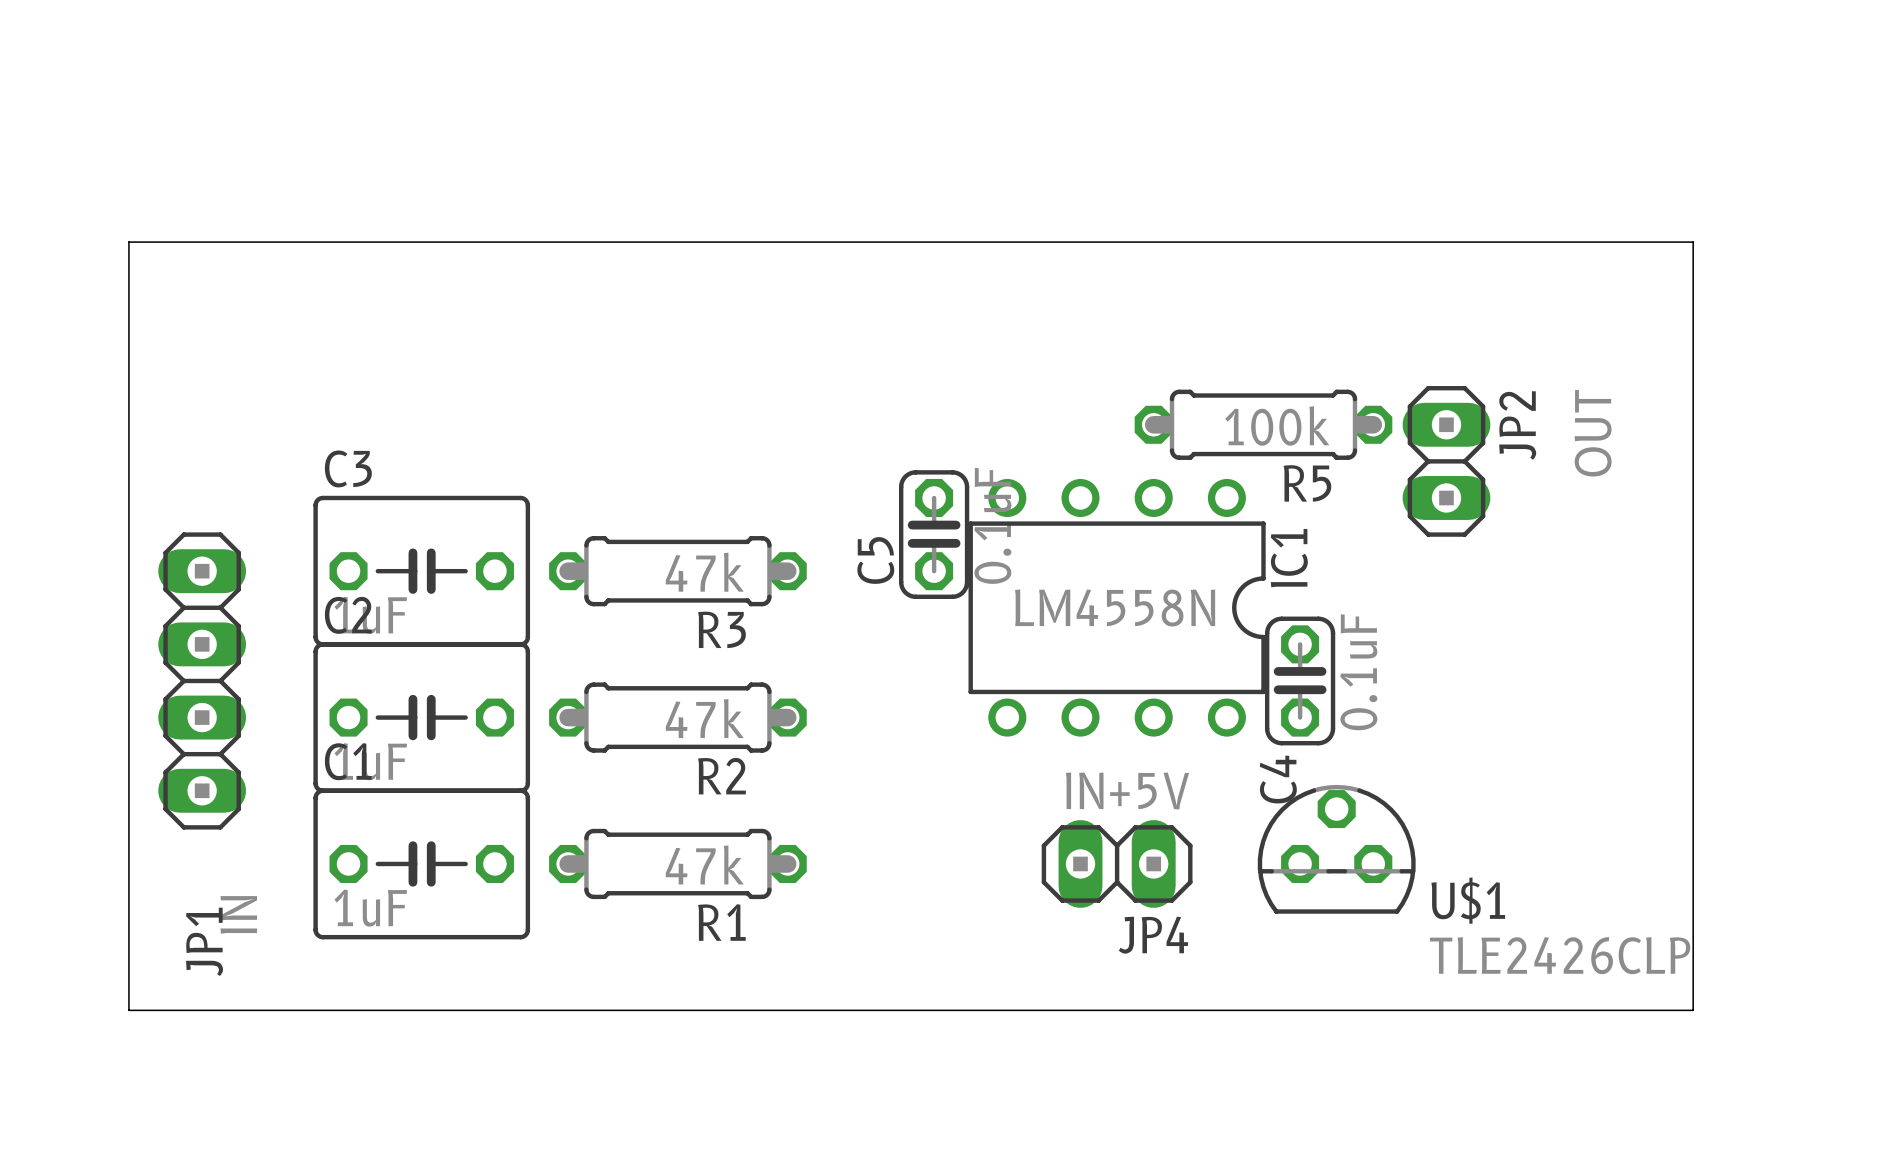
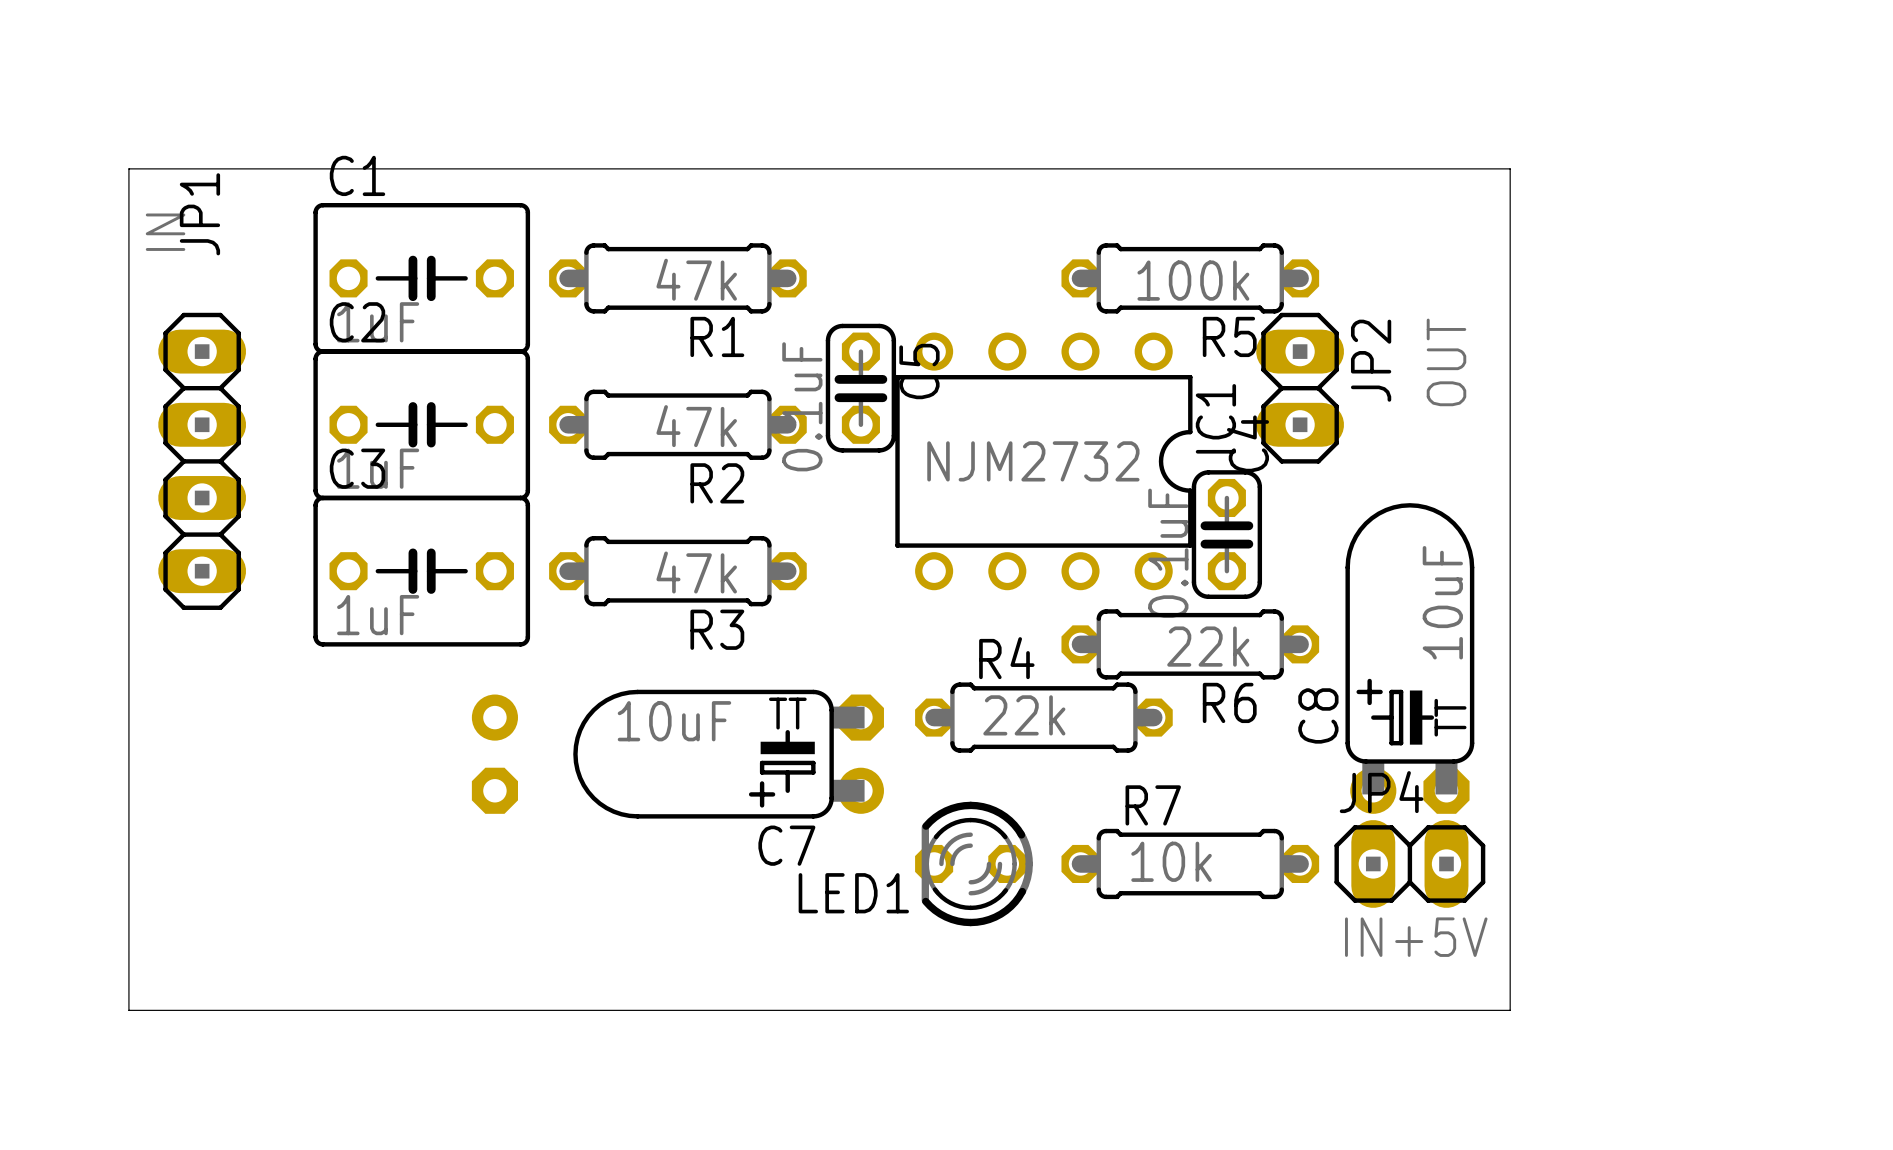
board edge: (128, 242) (1693, 242) (1693, 1010) (1510, 1010) -> (128, 242) (128, 168) (1510, 168) (1510, 1010)
R5 position: (1263, 424) -> (1190, 278)
JP2 position: (1446, 461) -> (1300, 388)
C5 rotation: 0° (934, 534) -> 180° (860, 388)
C5 position: (934, 534) -> (860, 388)
IC1 value: LM4558N (1115, 607) -> NJM2732 (1033, 461)
IC1 position: (1117, 607) -> (1043, 461)
R6: none -> 22k (1190, 644)
C8: none -> 10uF (1409, 658)
JP1 position: (202, 680) -> (202, 461)
C4 rotation: 0° (1300, 680) -> 180° (1226, 534)
C4 position: (1300, 680) -> (1226, 534)
C2 position: (421, 717) -> (421, 424)
R2 position: (677, 717) -> (677, 424)
R4: none -> 22k (1043, 717)
part: none -> (494, 754)
C7: none -> 10uF (728, 754)
JP4 value position: IN+5V (1127, 791) -> IN+5V (1416, 937)
U$1: TLE2426CLP (1336, 849) -> none
C1 position: (421, 863) -> (421, 278)
R1 position: (677, 863) -> (677, 278)
LED1: none -> (974, 863)
JP4 position: (1117, 863) -> (1409, 863)
R7: none -> 10k (1190, 863)
JP1 value position: IN (238, 914) -> IN (165, 232)
JP4 name position: JP4 (1153, 935) -> JP4 (1381, 792)
JP1 name position: JP1 (204, 941) -> JP1 (199, 214)

